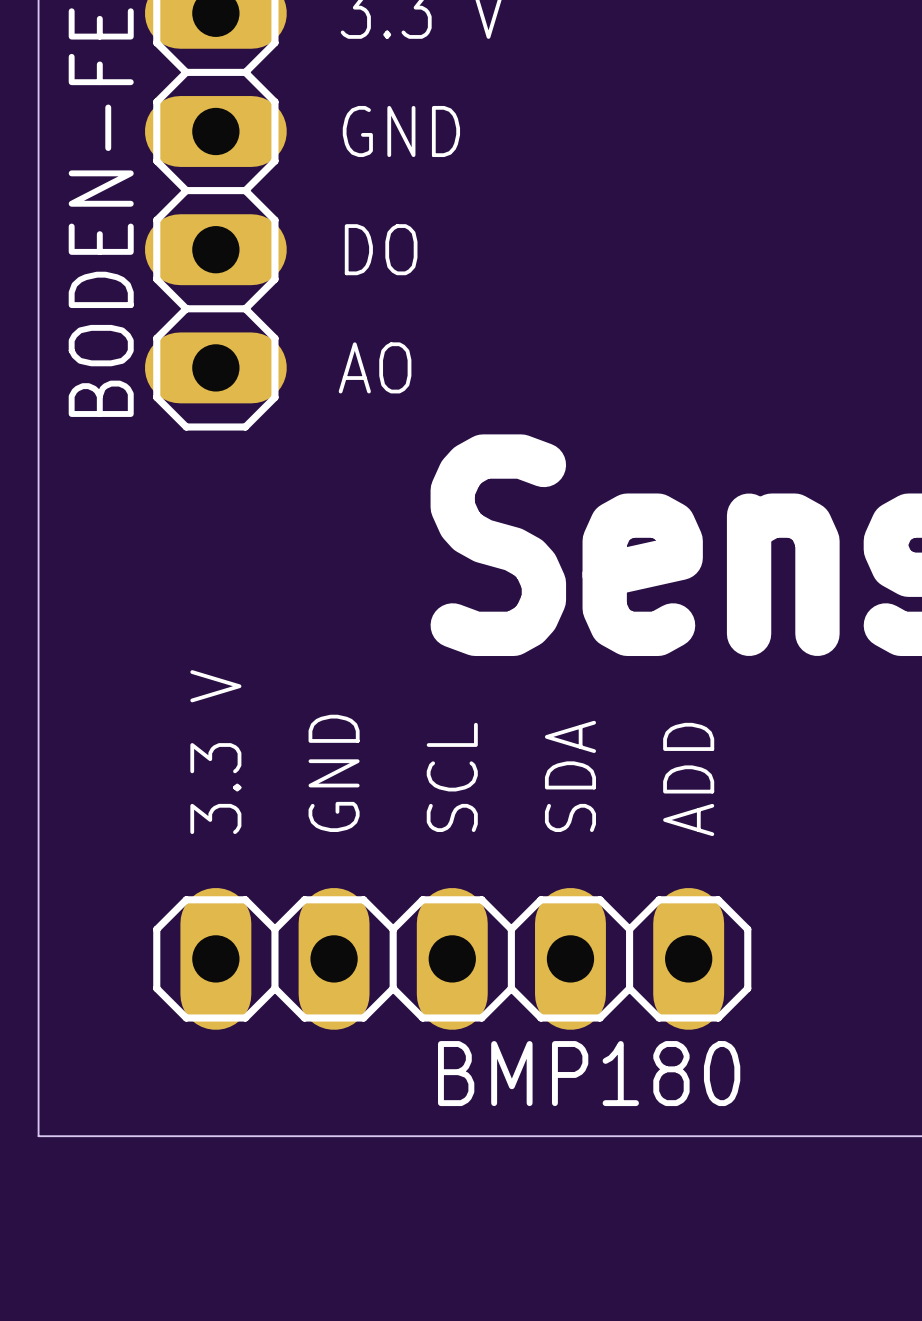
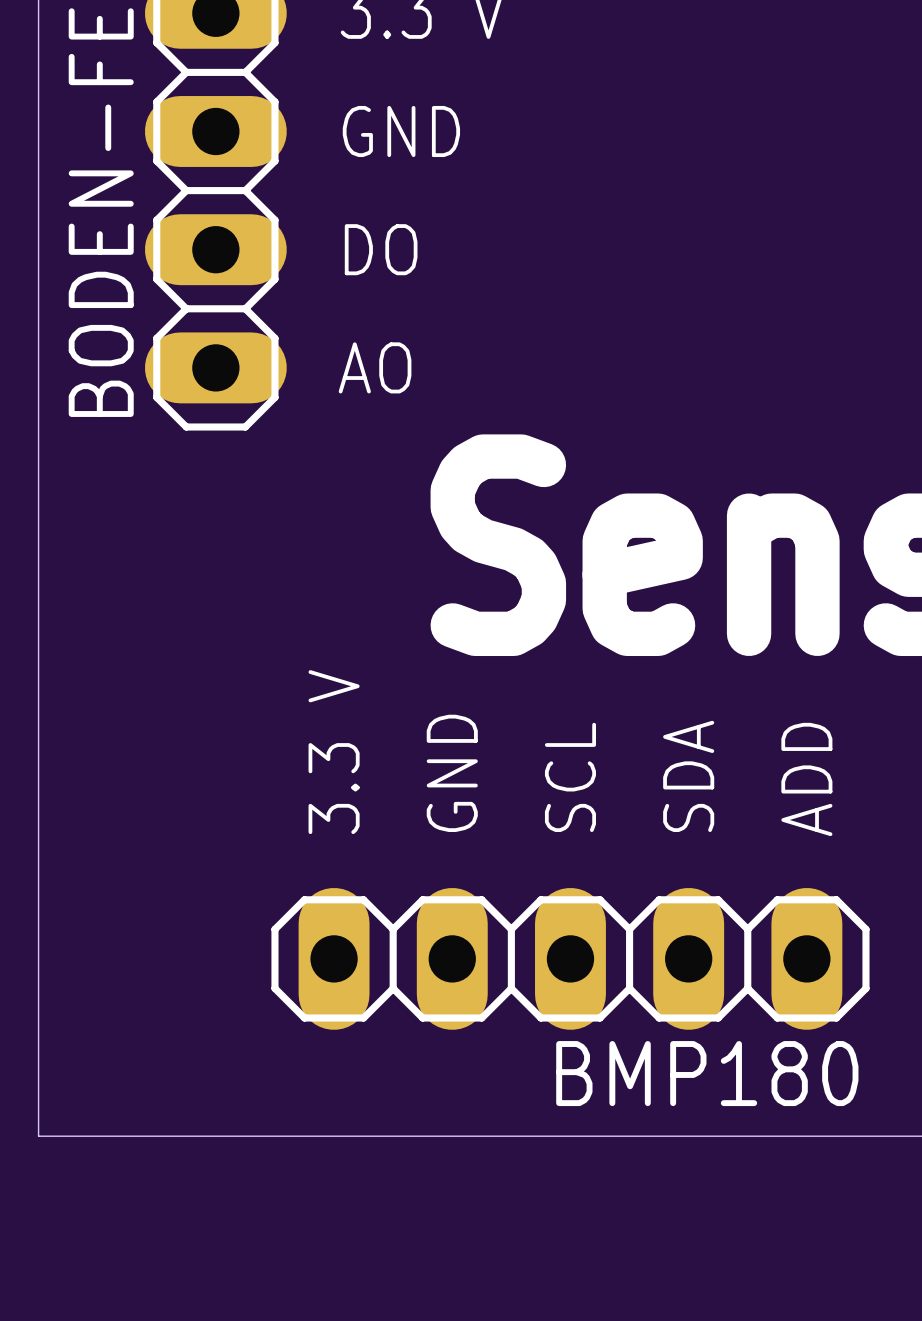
text: 3.3 V (215, 752) -> none
text: GND (334, 773) -> 3.3 V (334, 752)
text: SDA (570, 776) -> SCL (570, 777)
text: SCL (452, 777) -> GND (452, 773)
text: ADD (688, 779) -> SDA (688, 776)
text: none -> ADD (806, 779)
BMP180 position: (452, 958) -> (570, 958)

